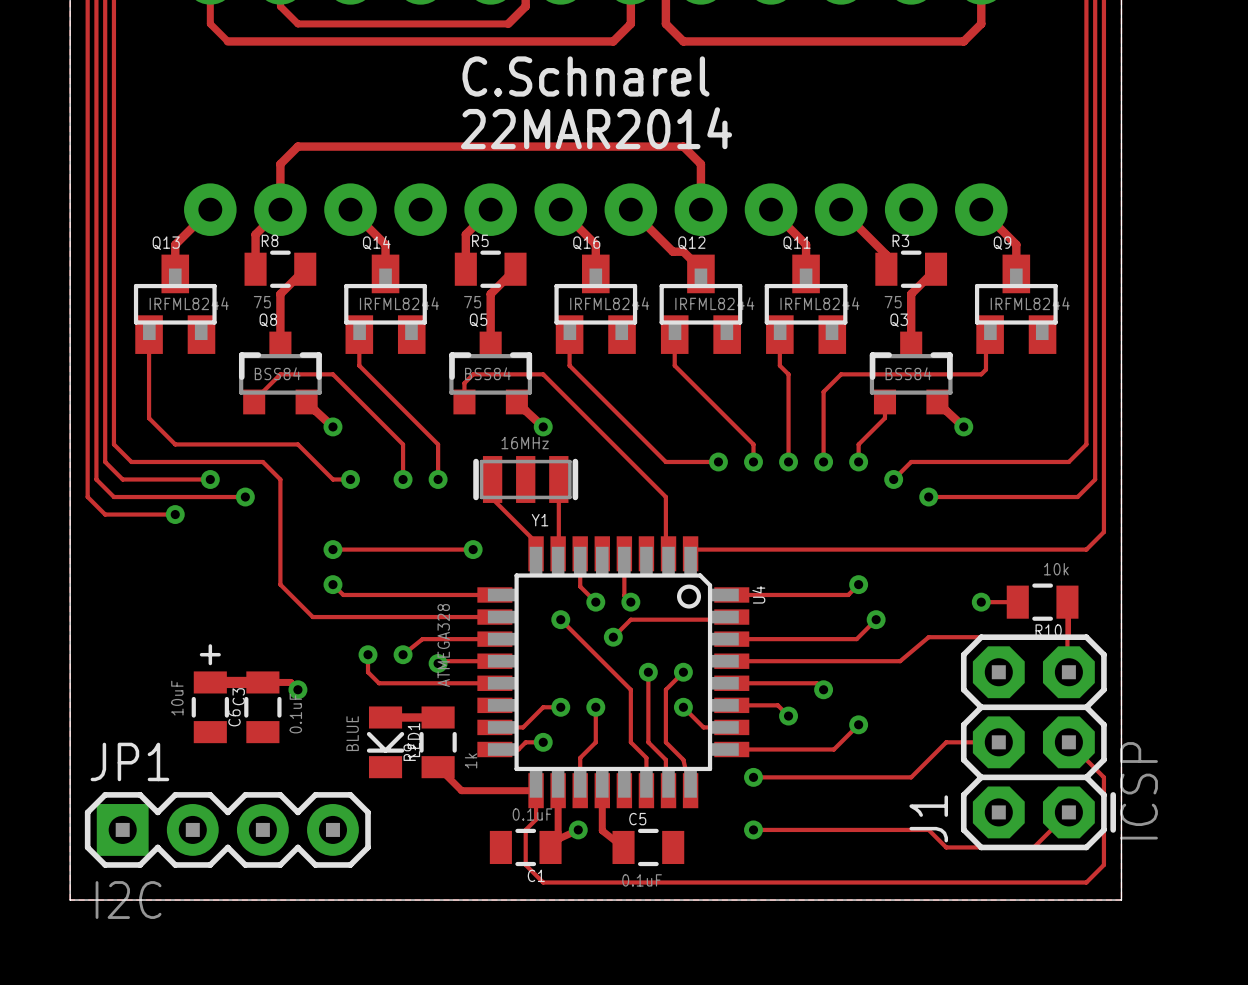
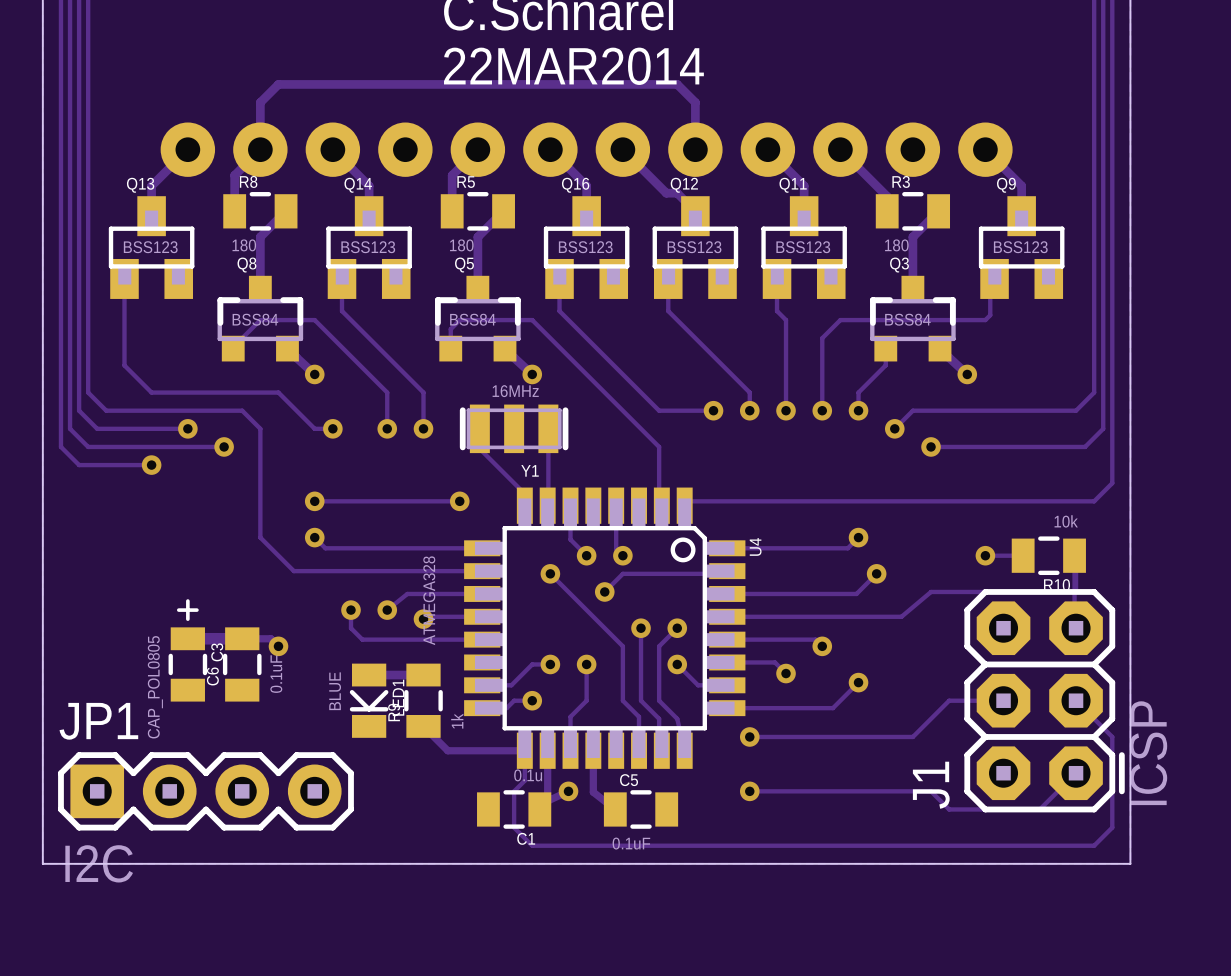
R8 value: 75 (262, 302) -> 180 (244, 245)
R5 value: 75 (472, 302) -> 180 (461, 245)
R3 value: 75 (893, 302) -> 180 (896, 245)
Q13 value: IRFML8244 (189, 303) -> BSS123 (150, 247)
Q14 value: IRFML8244 (399, 303) -> BSS123 (368, 247)
Q16 value: IRFML8244 (609, 303) -> BSS123 (585, 247)
Q12 value: IRFML8244 (714, 303) -> BSS123 (694, 247)
Q11 value: IRFML8244 (819, 303) -> BSS123 (803, 247)
Q9 value: IRFML8244 (1030, 303) -> BSS123 (1020, 247)
C3 value: 10uF (177, 698) -> CAP_POL0805 (155, 687)
C1 value: 0.1uF (532, 814) -> 0.1u (528, 775)

